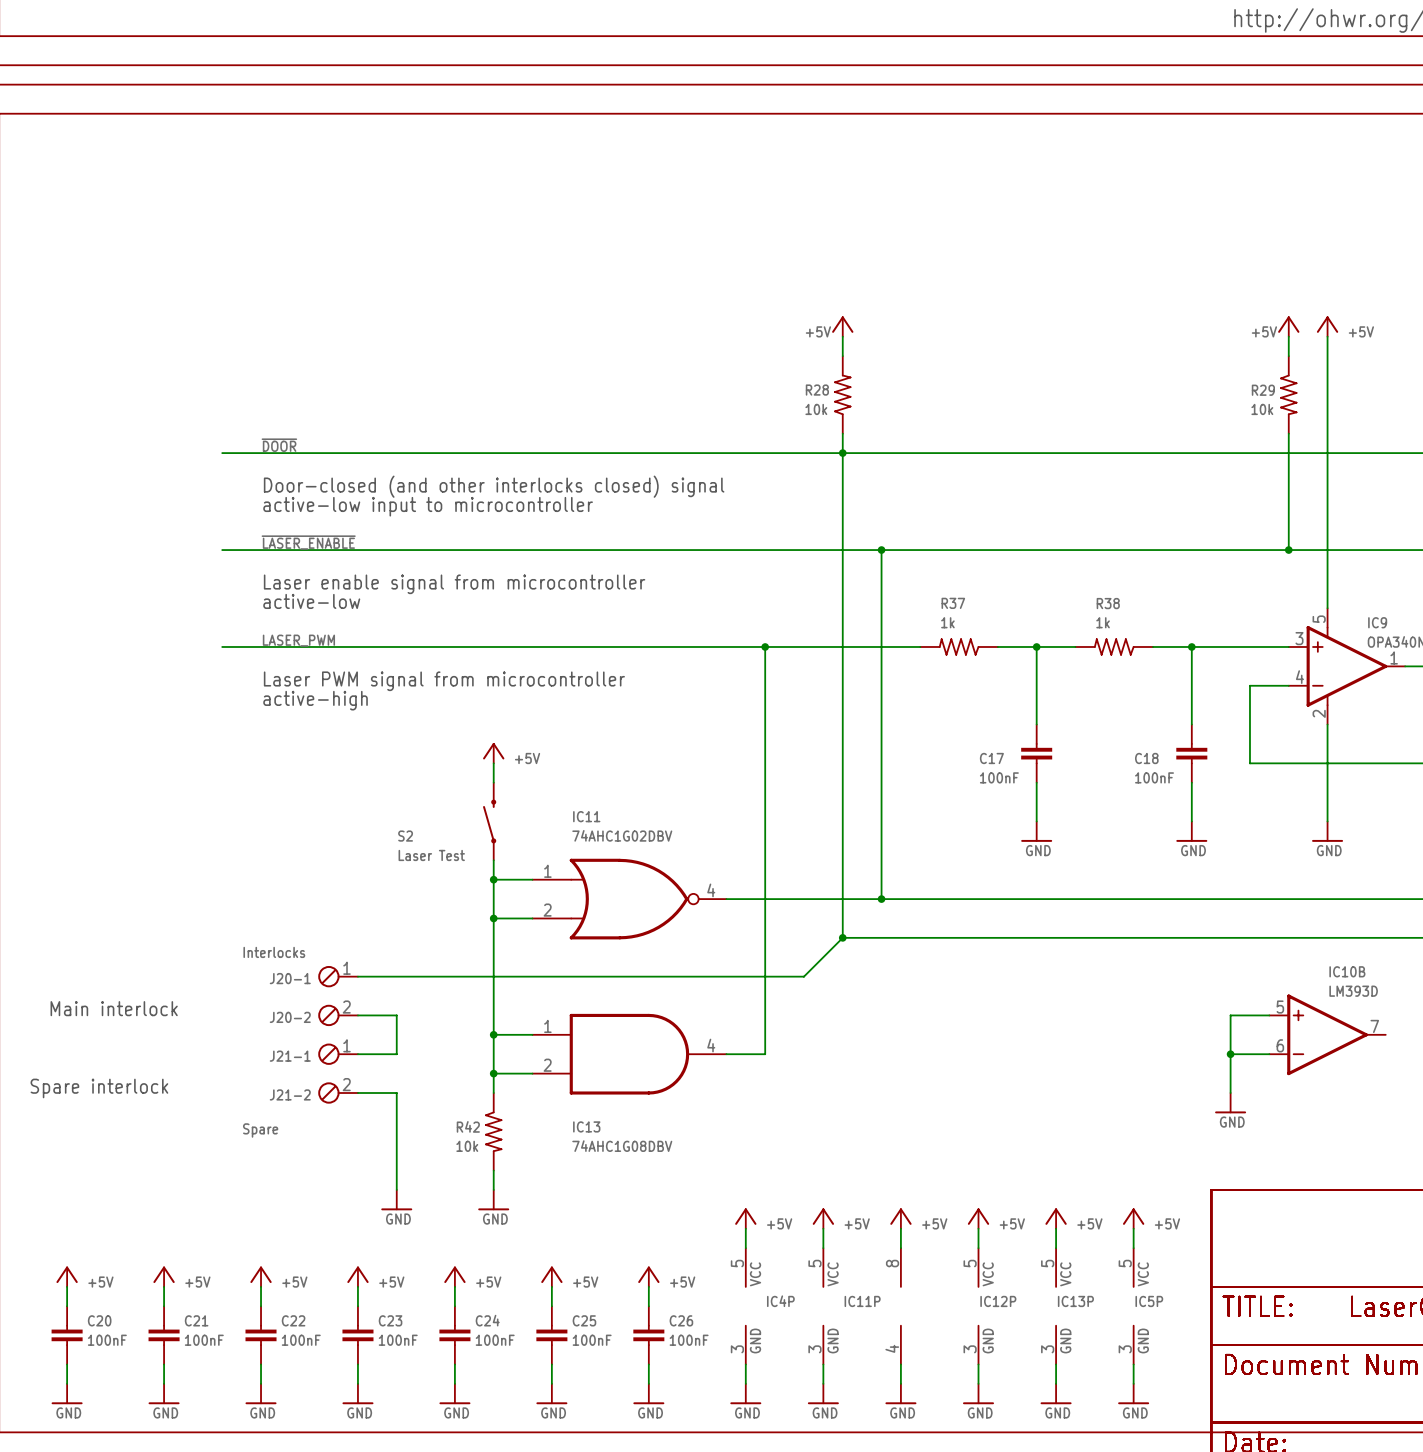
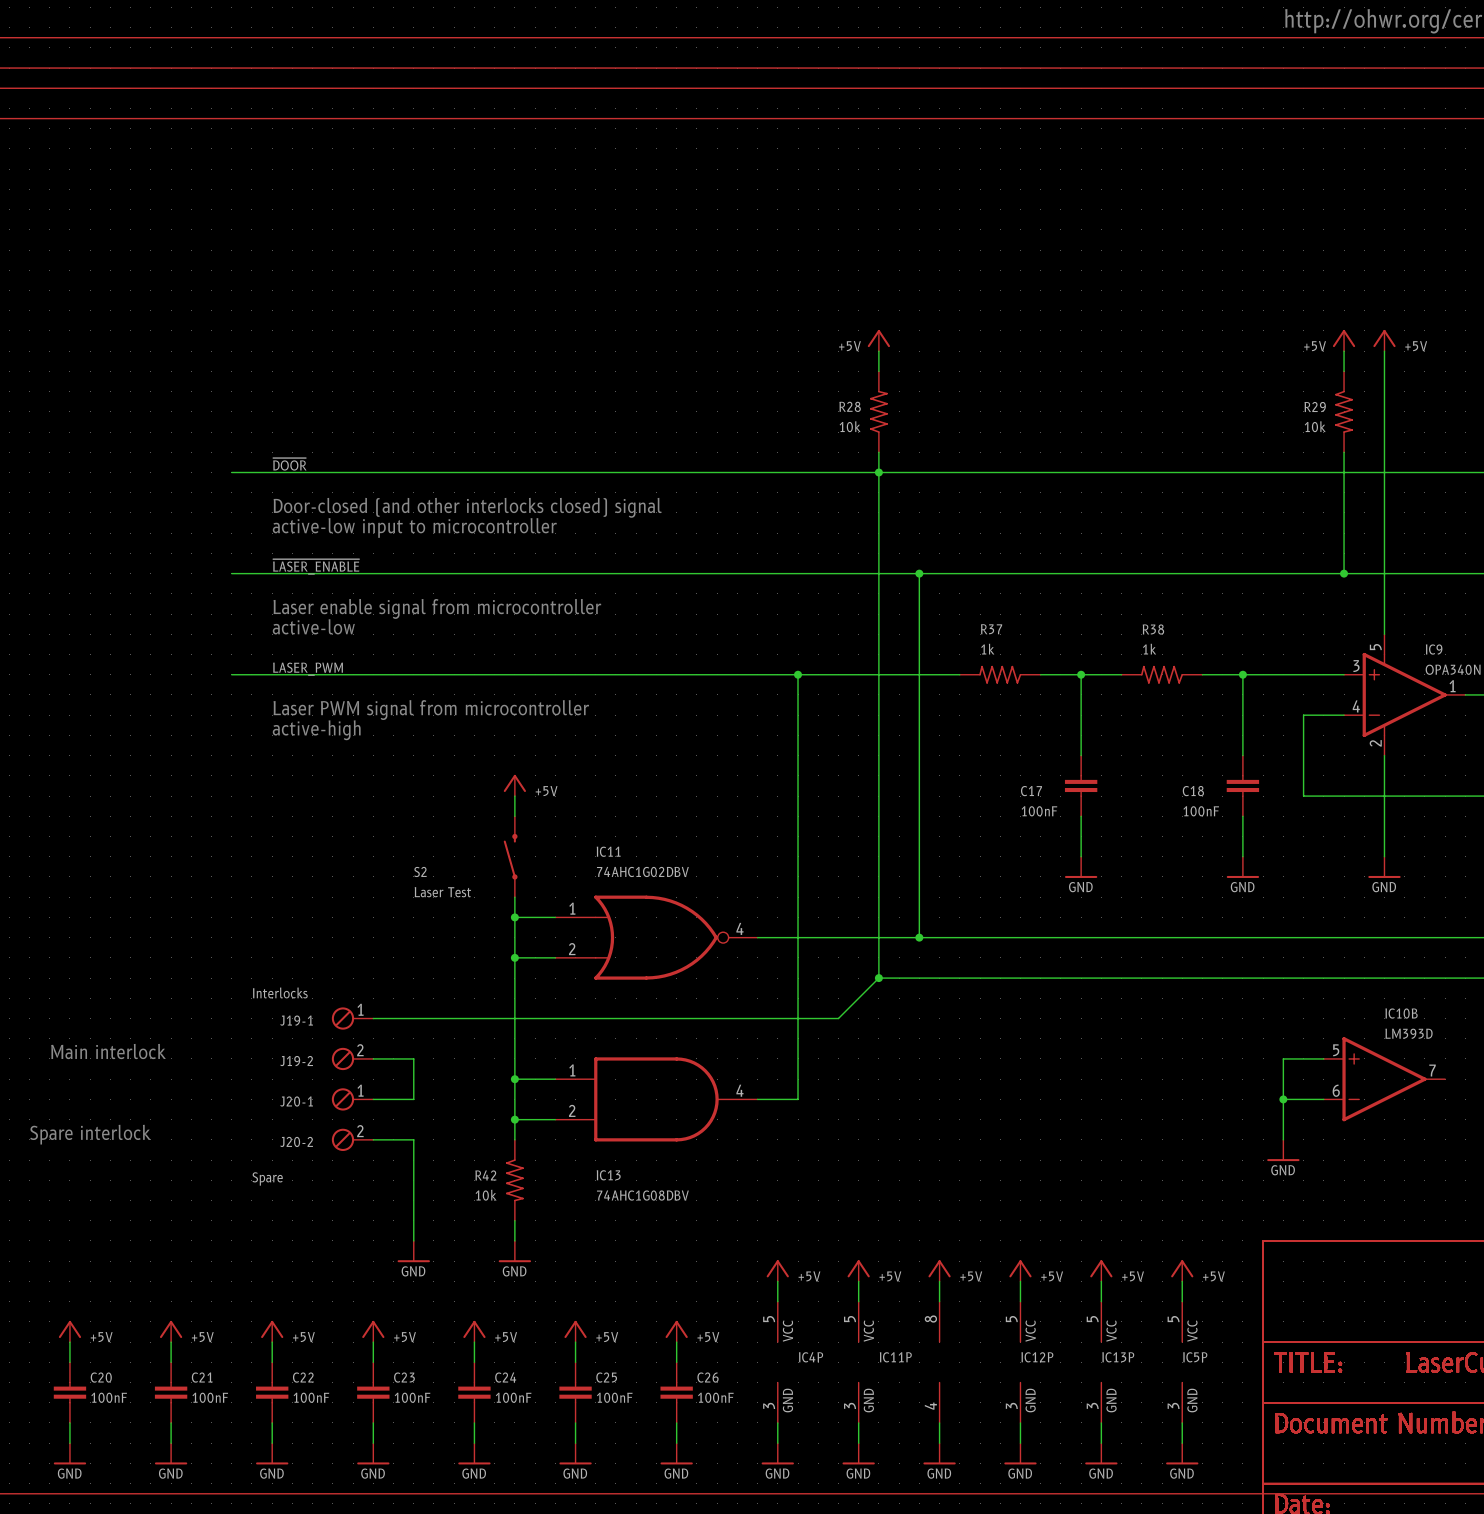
J20-1 name: J20-1 (290, 978) -> J19-1 (296, 1020)
J20-2 name: J20-2 (290, 1017) -> J19-2 (296, 1061)
J21-1 name: J21-1 (290, 1056) -> J20-1 (296, 1101)
J21-2 name: J21-2 (290, 1094) -> J20-2 (296, 1141)

